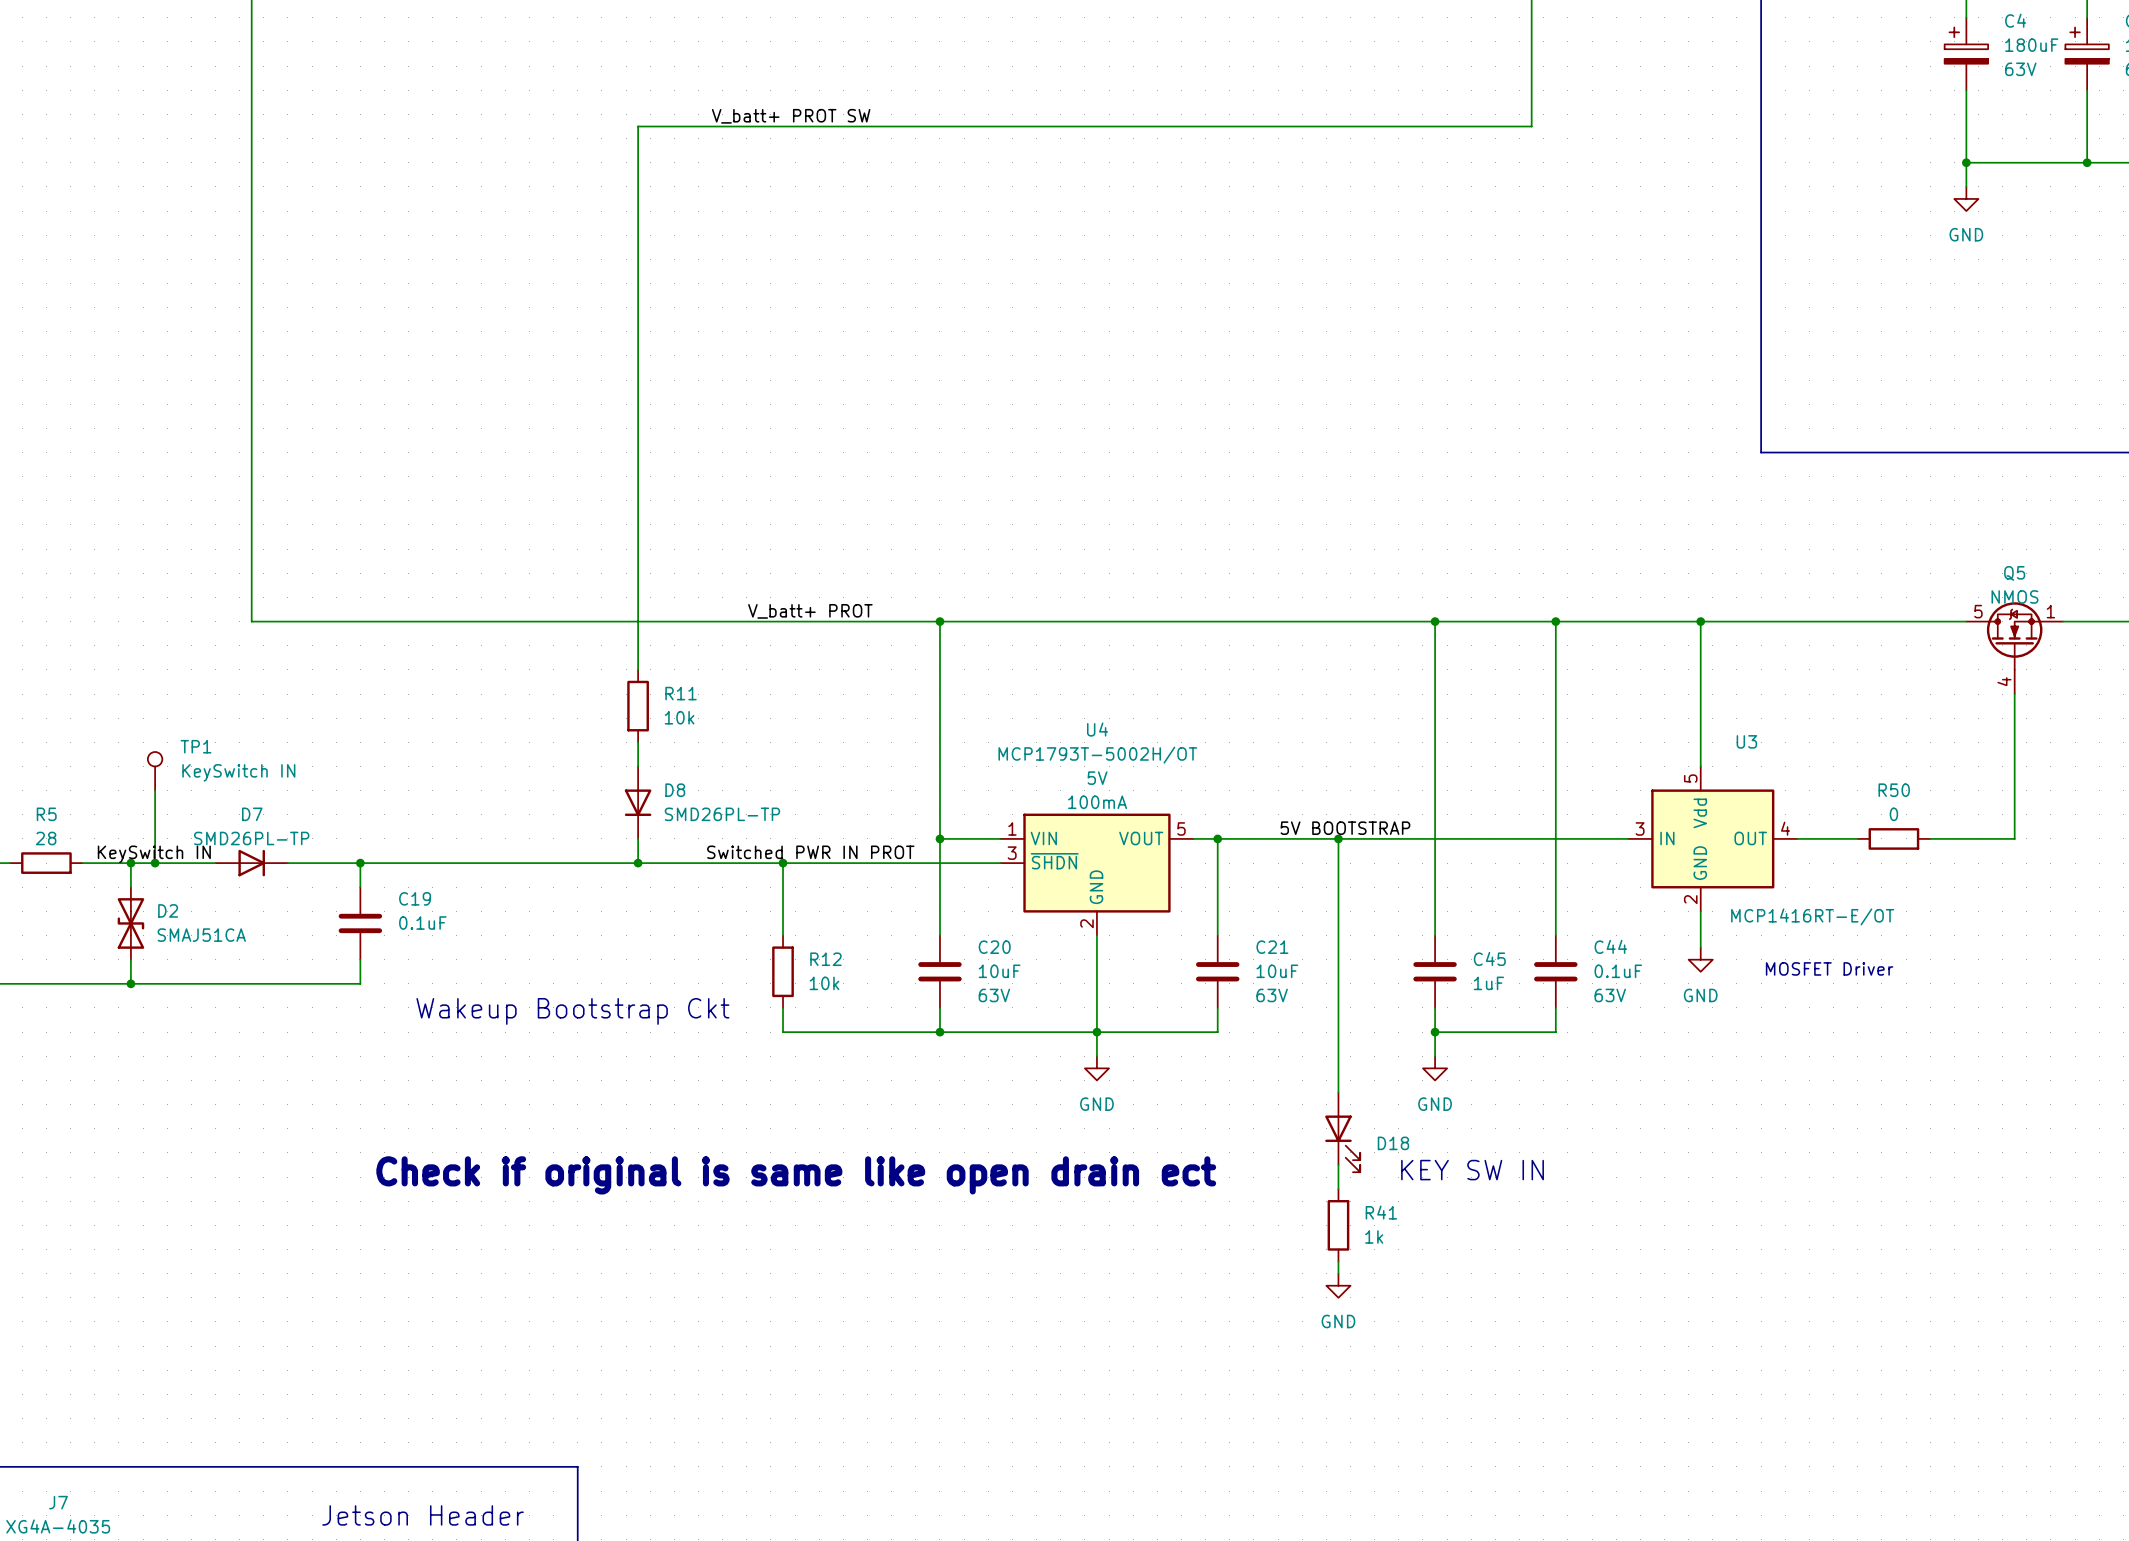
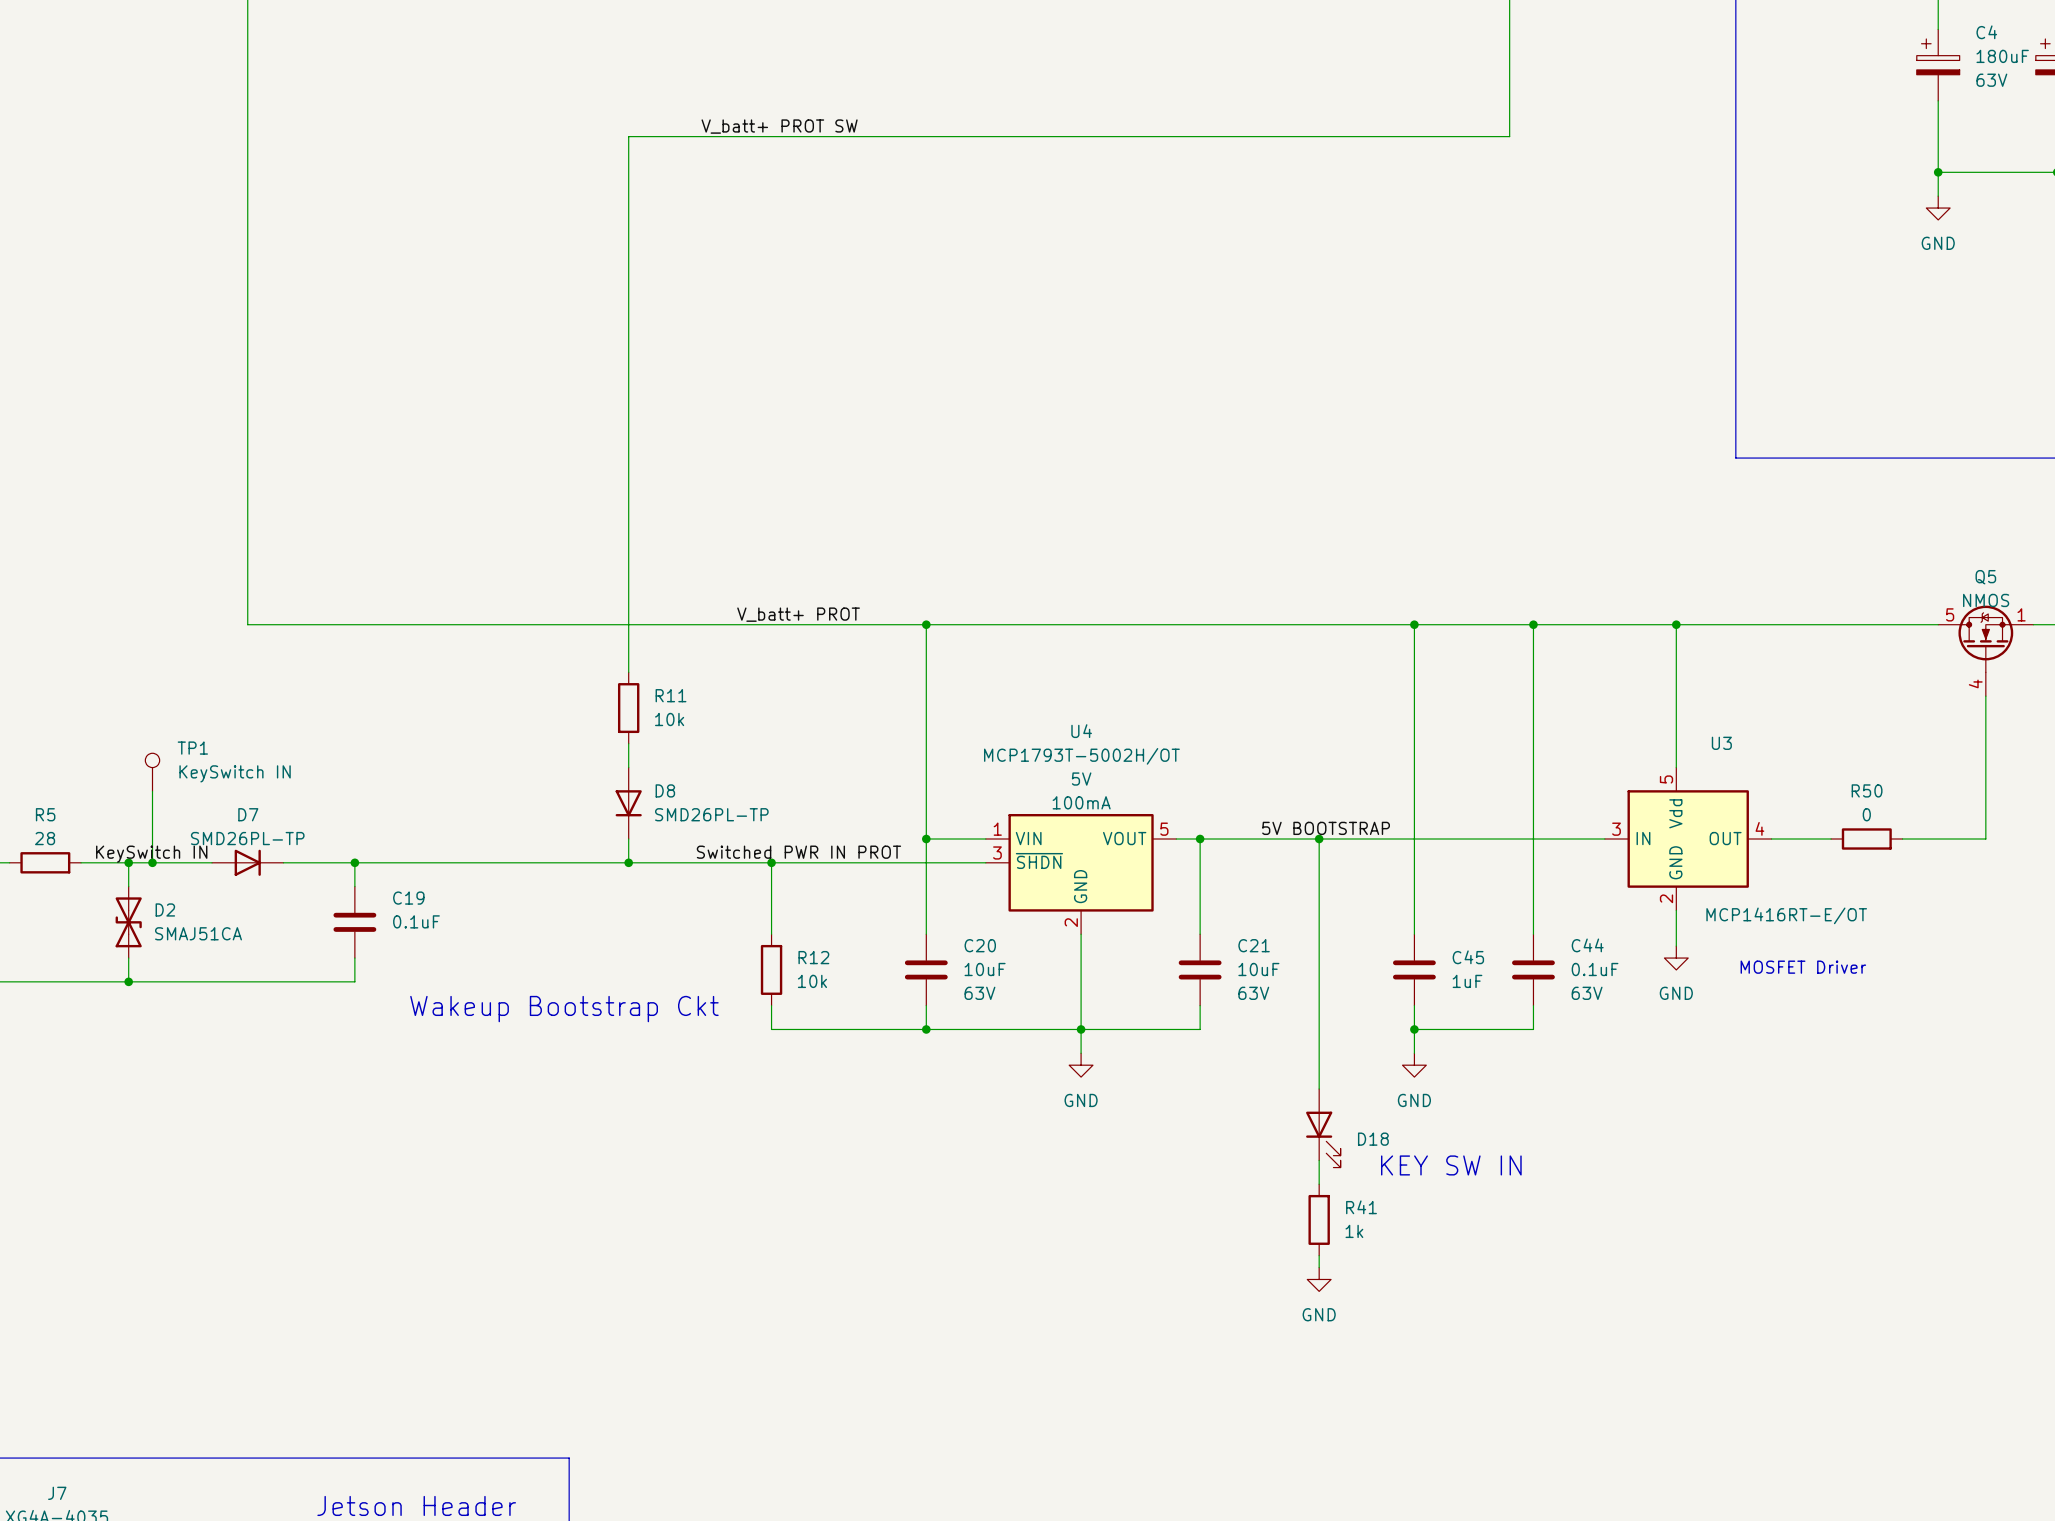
text: Check if original is same like open drain ect (796, 1175) -> none

